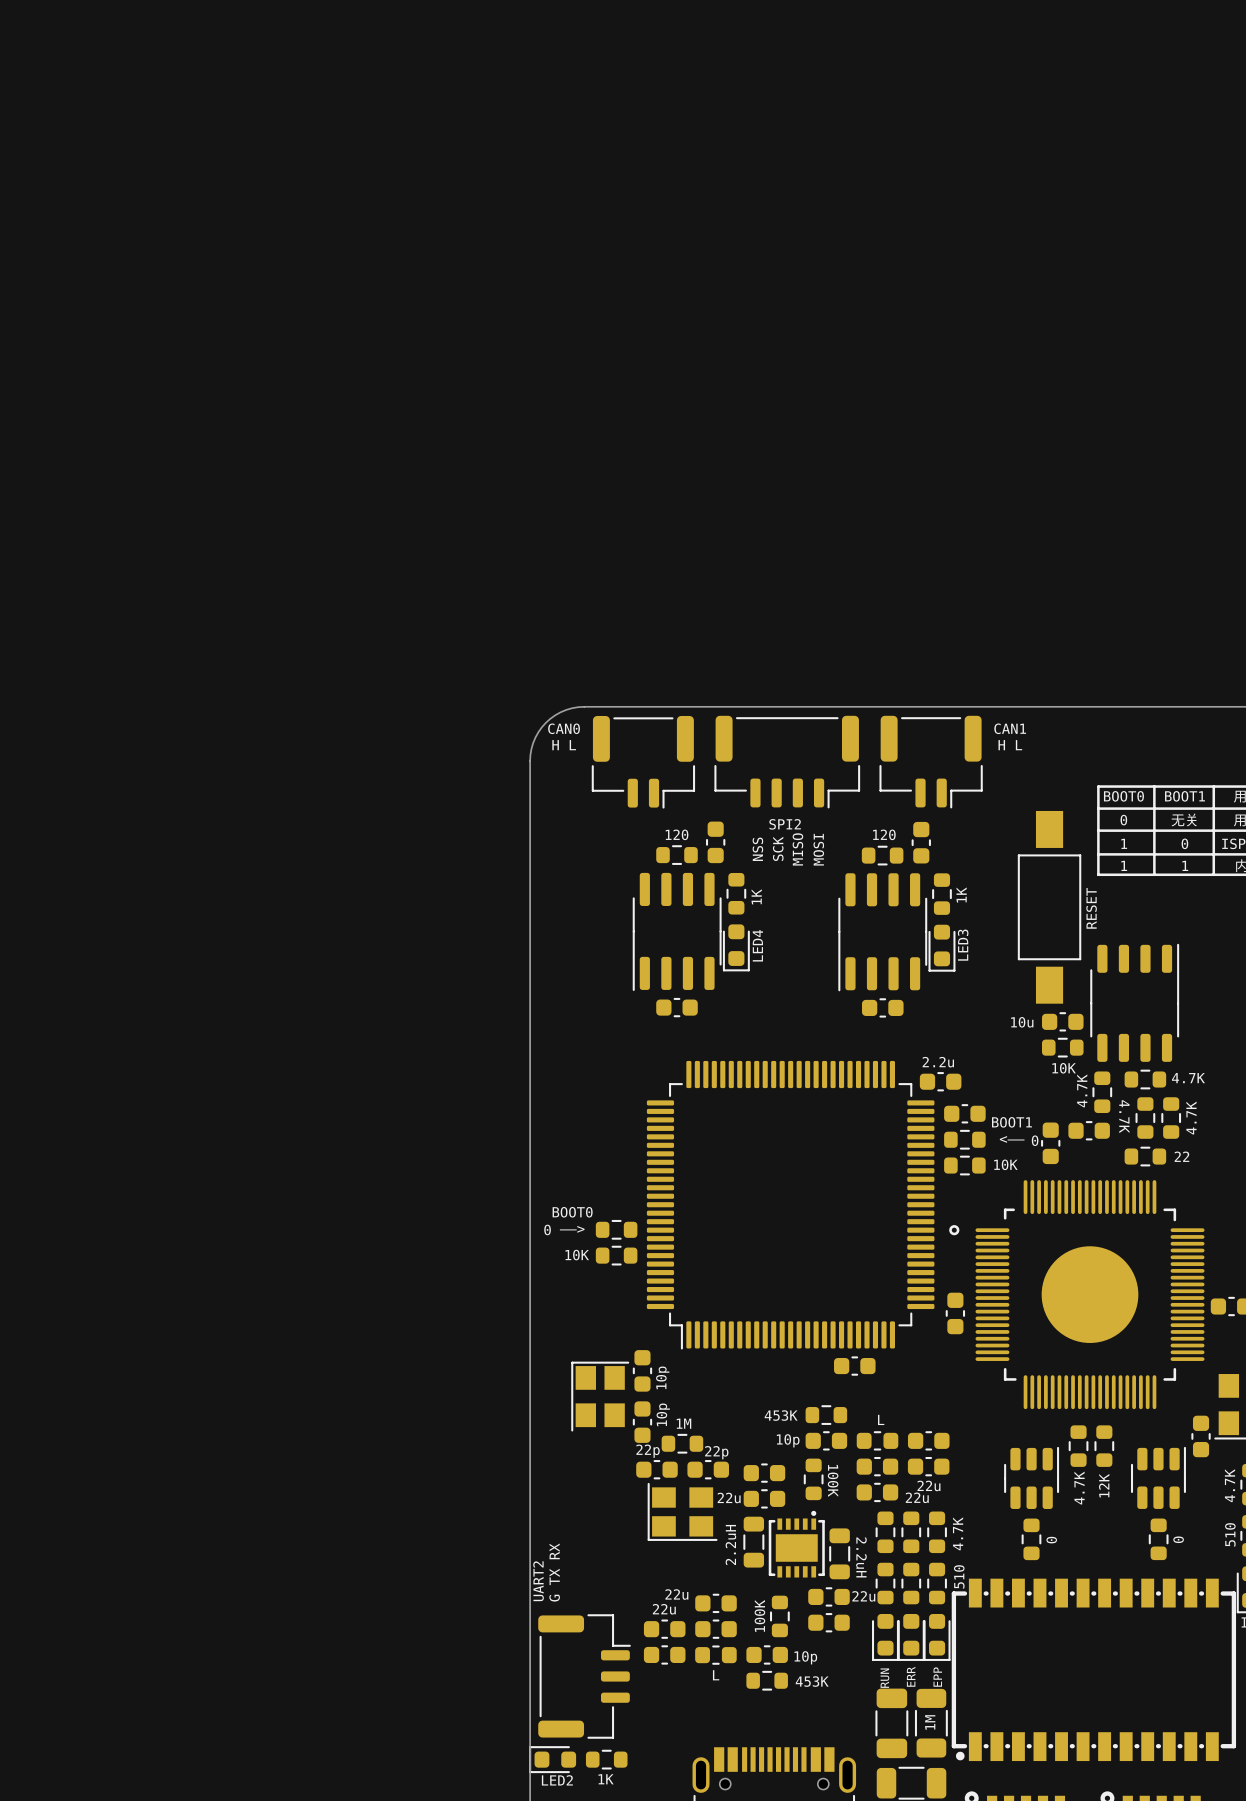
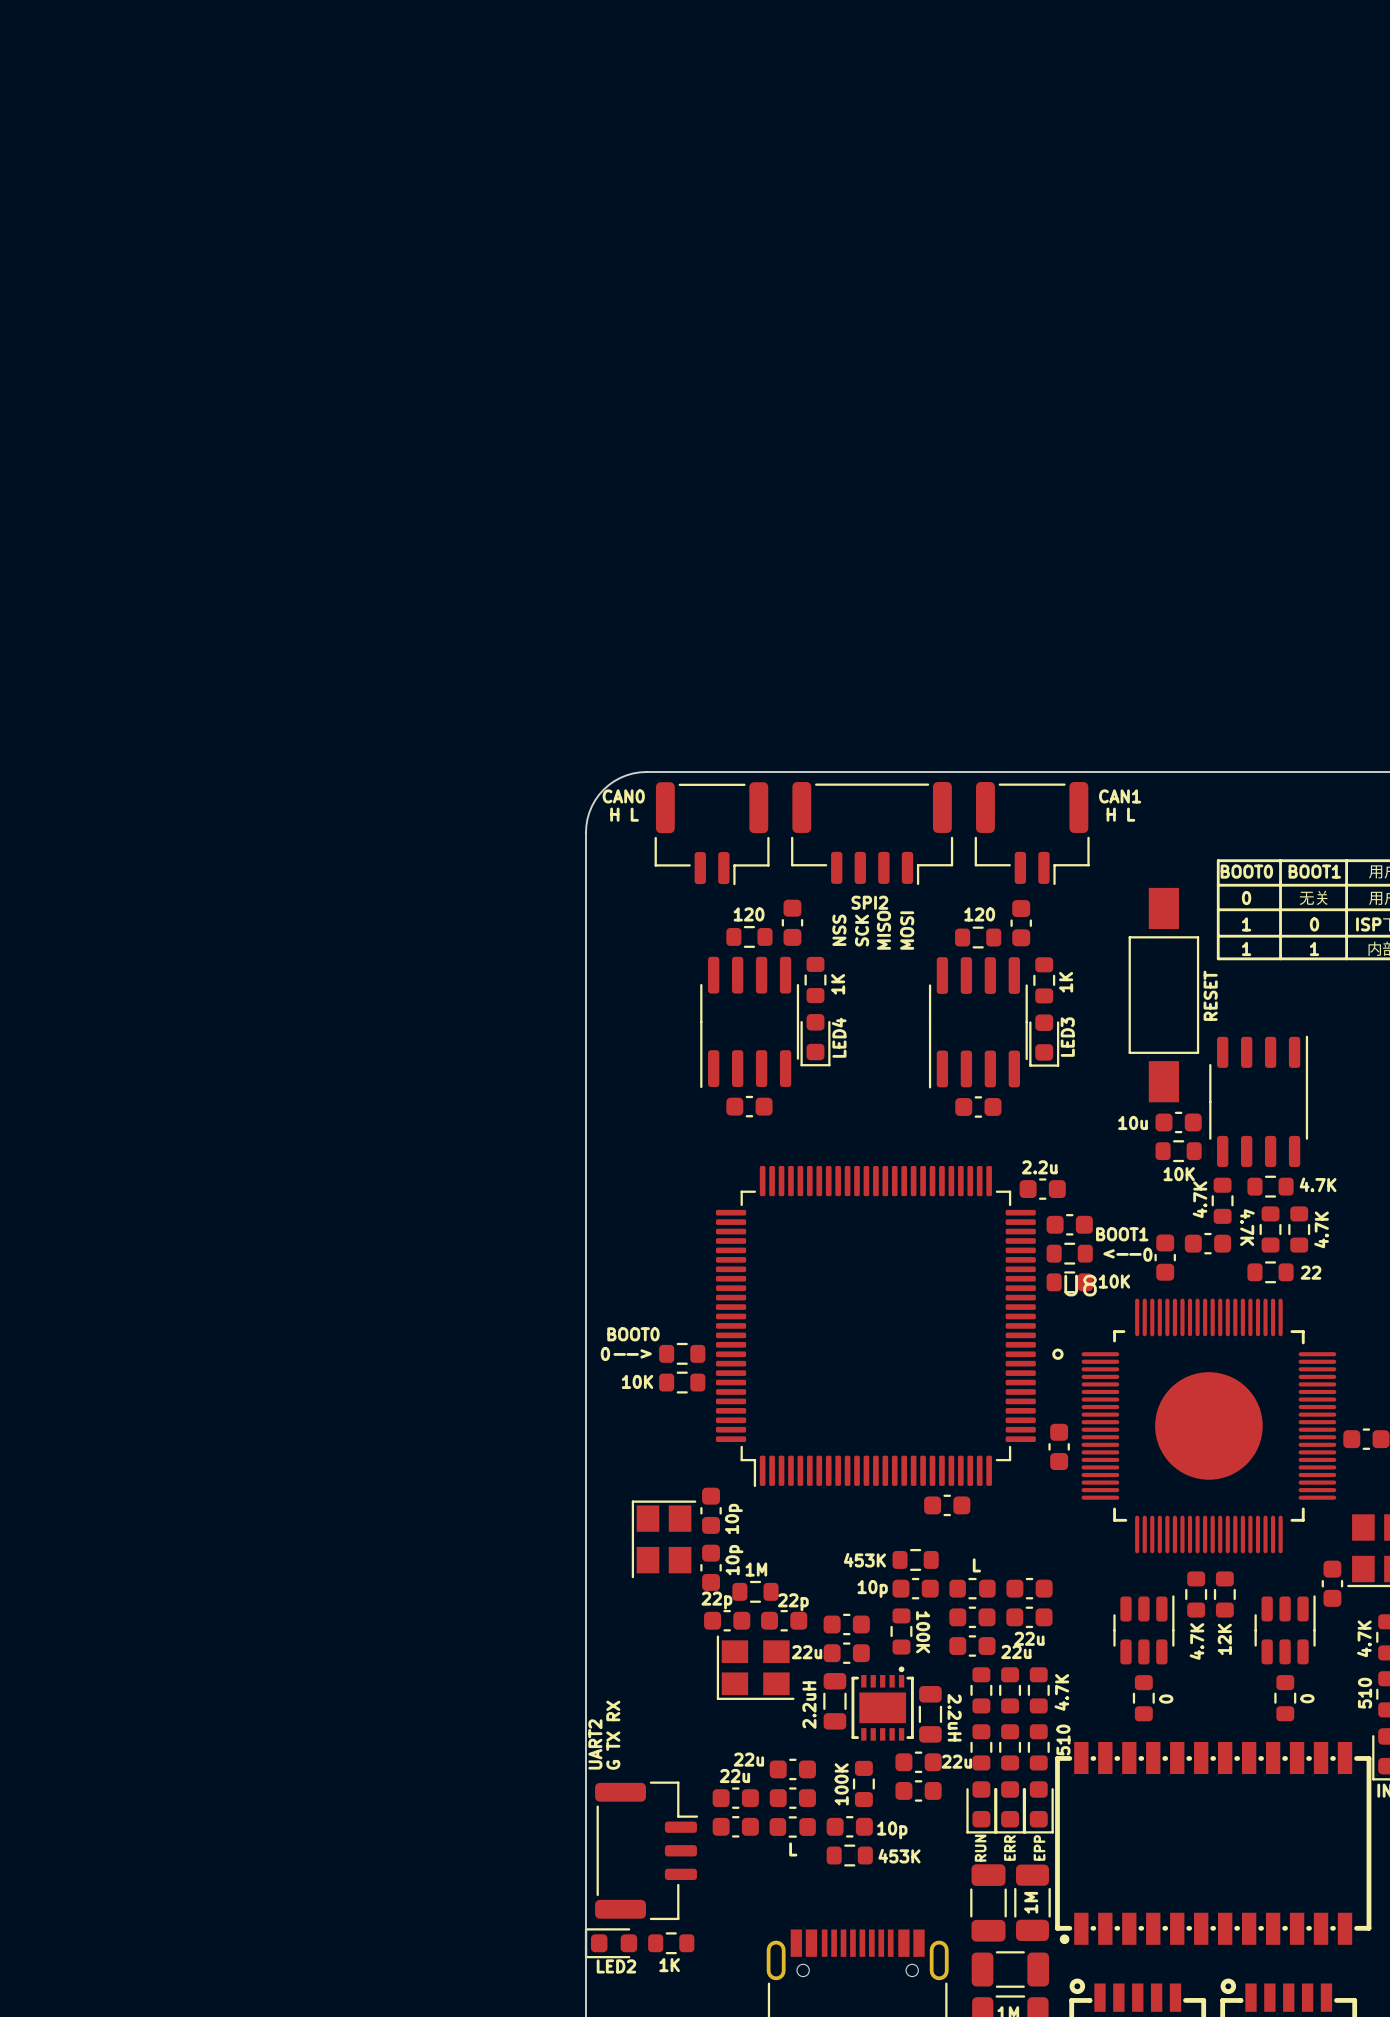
U8 name: none -> U8 (1080, 1285)

